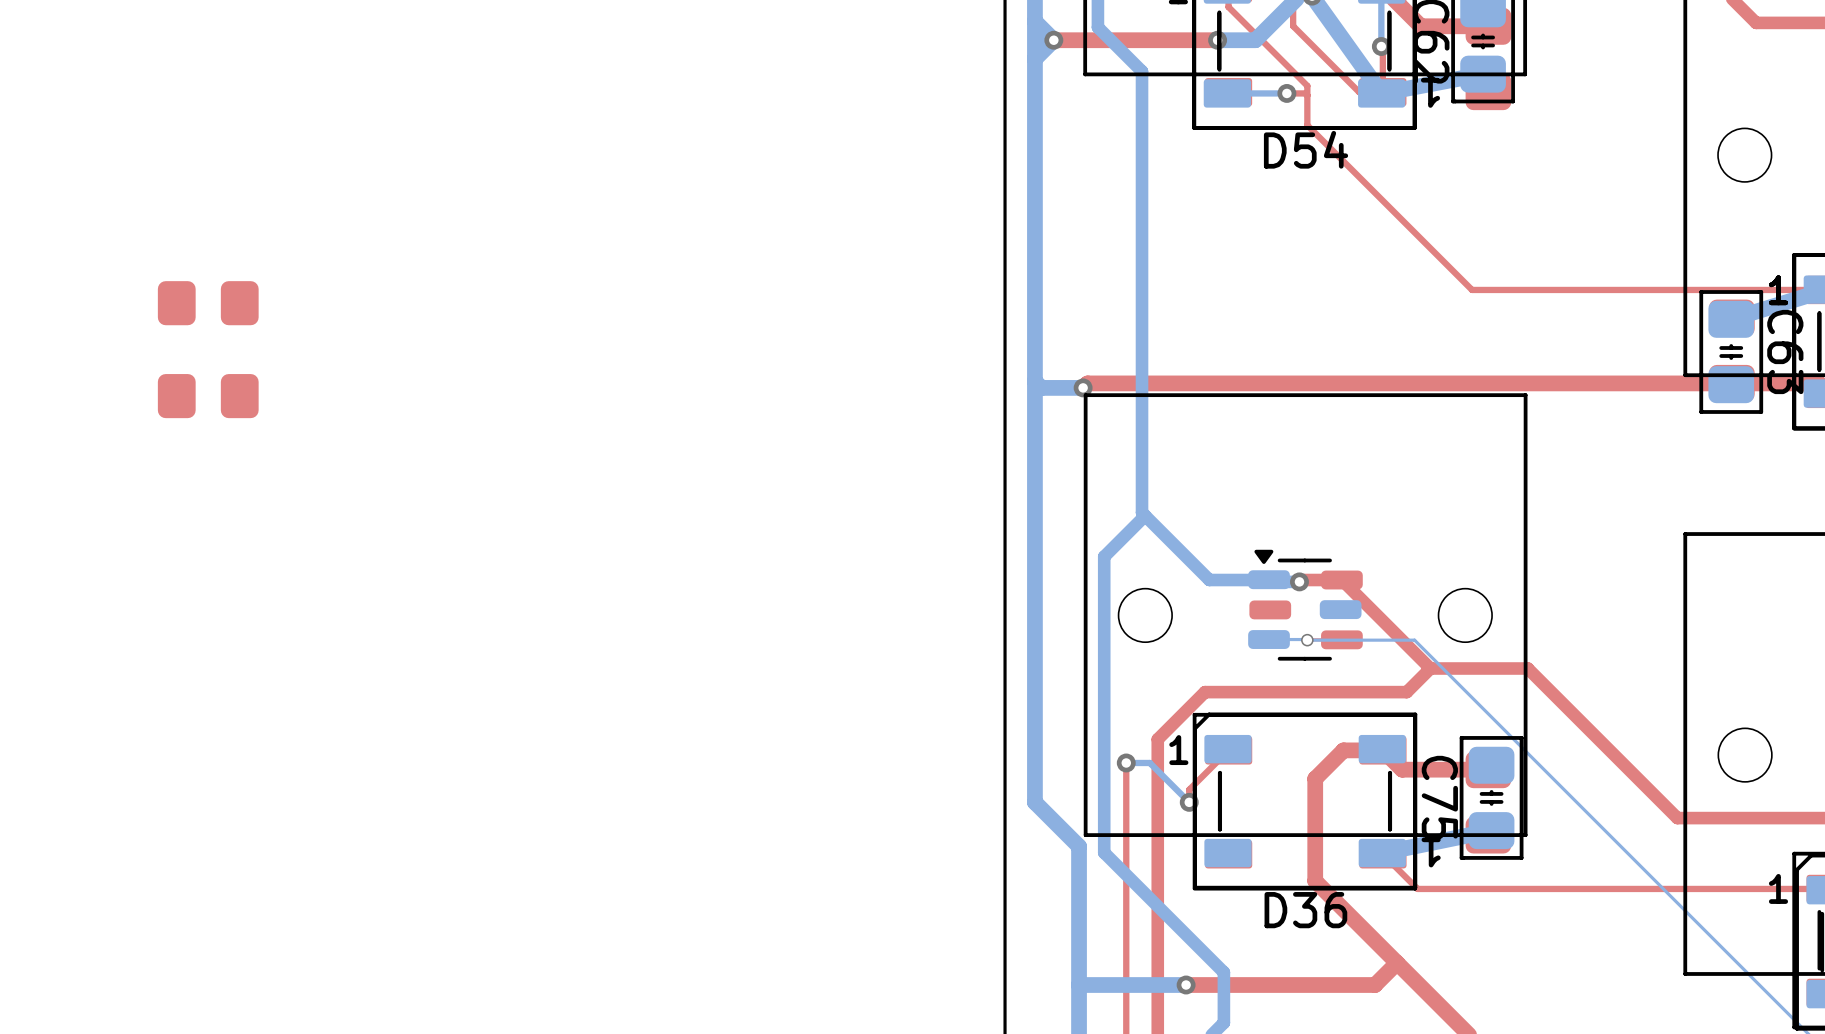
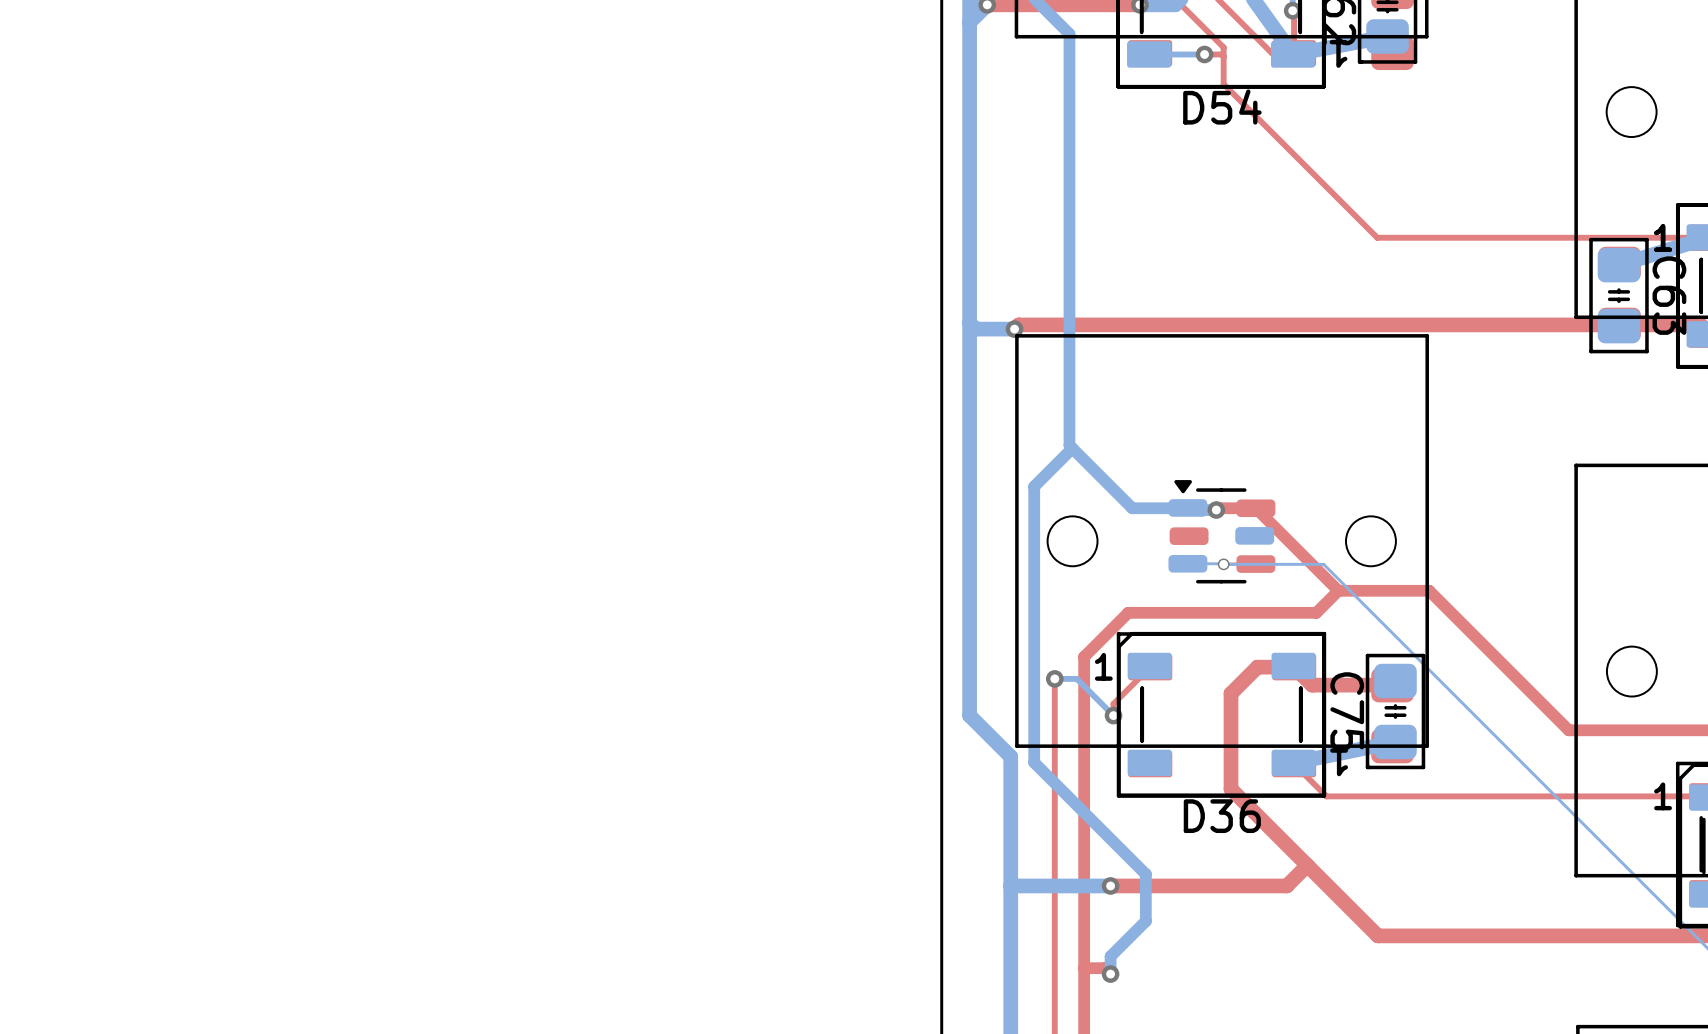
part: (208, 303) -> none
part: (208, 396) -> none

